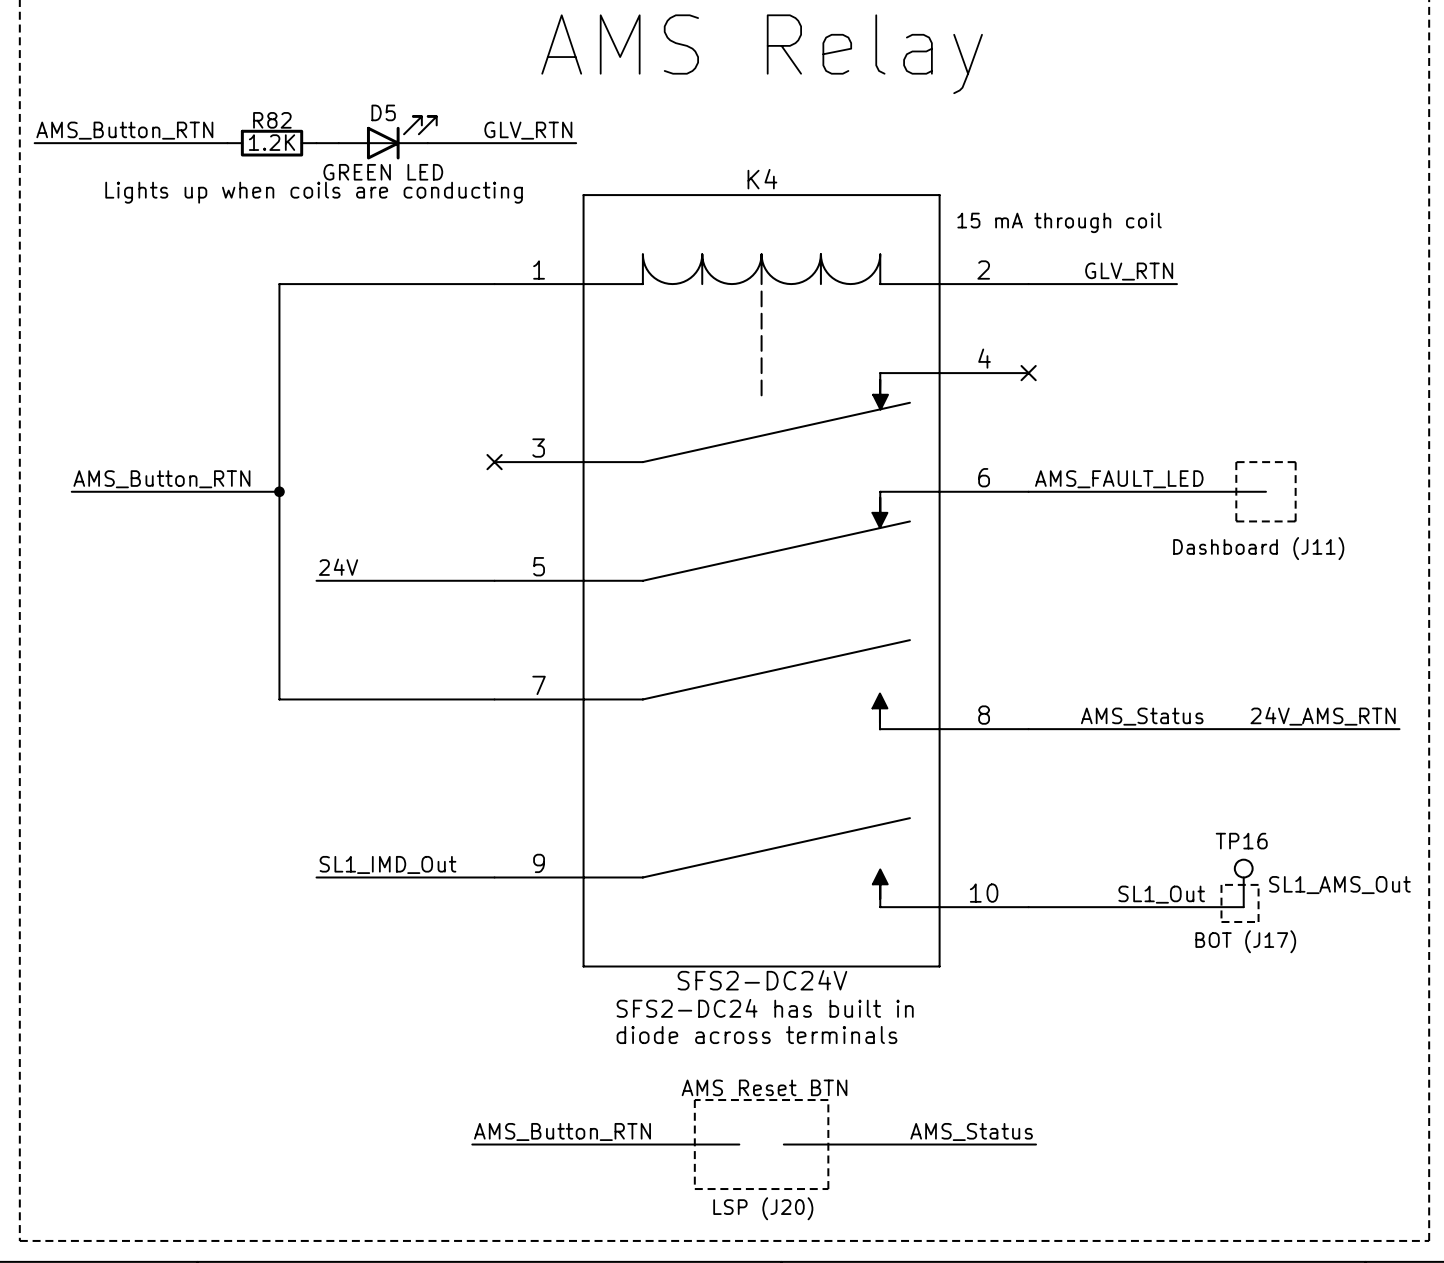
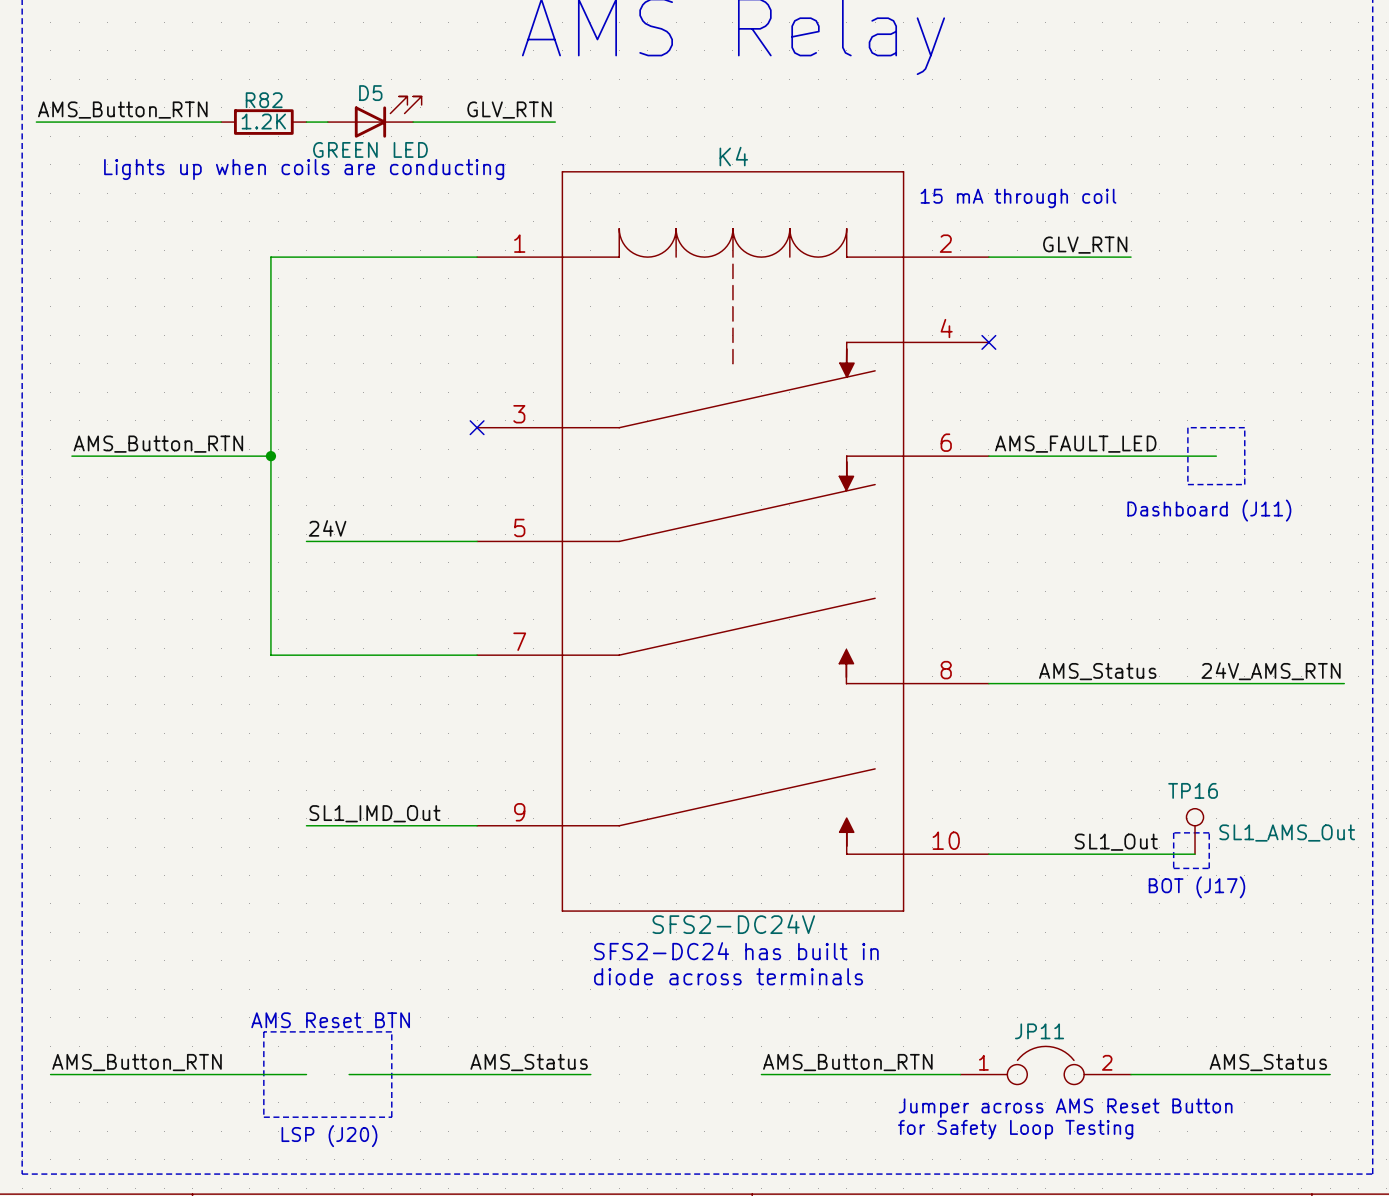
text: none -> AMS Reset BTN (330, 1020)
text: AMS Reset BTN (764, 1087) -> none
line: none -> (263, 1031) (391, 1031) (391, 1117) (263, 1117) (263, 1031)
line: (694, 1100) (828, 1100) (828, 1189) (694, 1189) (694, 1100) -> none
label: none -> AMS_Button_RTN (137, 1062)
label: none -> AMS_Status (529, 1062)
label: none -> AMS_Button_RTN (847, 1062)
label: none -> AMS_Status (1268, 1062)
JP11: none -> (1045, 1065)
label: AMS_Button_RTN (562, 1131) -> none
label: AMS_Status (971, 1131) -> none
wire: none -> (50, 1074) (306, 1074)
wire: none -> (349, 1074) (590, 1074)
wire: none -> (761, 1074) (960, 1074)
wire: none -> (1131, 1074) (1330, 1074)
wire: (472, 1144) (739, 1144) -> none
wire: (783, 1144) (1036, 1144) -> none
text: none -> Jumper across AMS Reset Button (1065, 1108)
text: none -> for Safety Loop Testing (1015, 1129)
text: none -> LSP (J20) (329, 1136)
text: LSP (J20) (763, 1208) -> none

